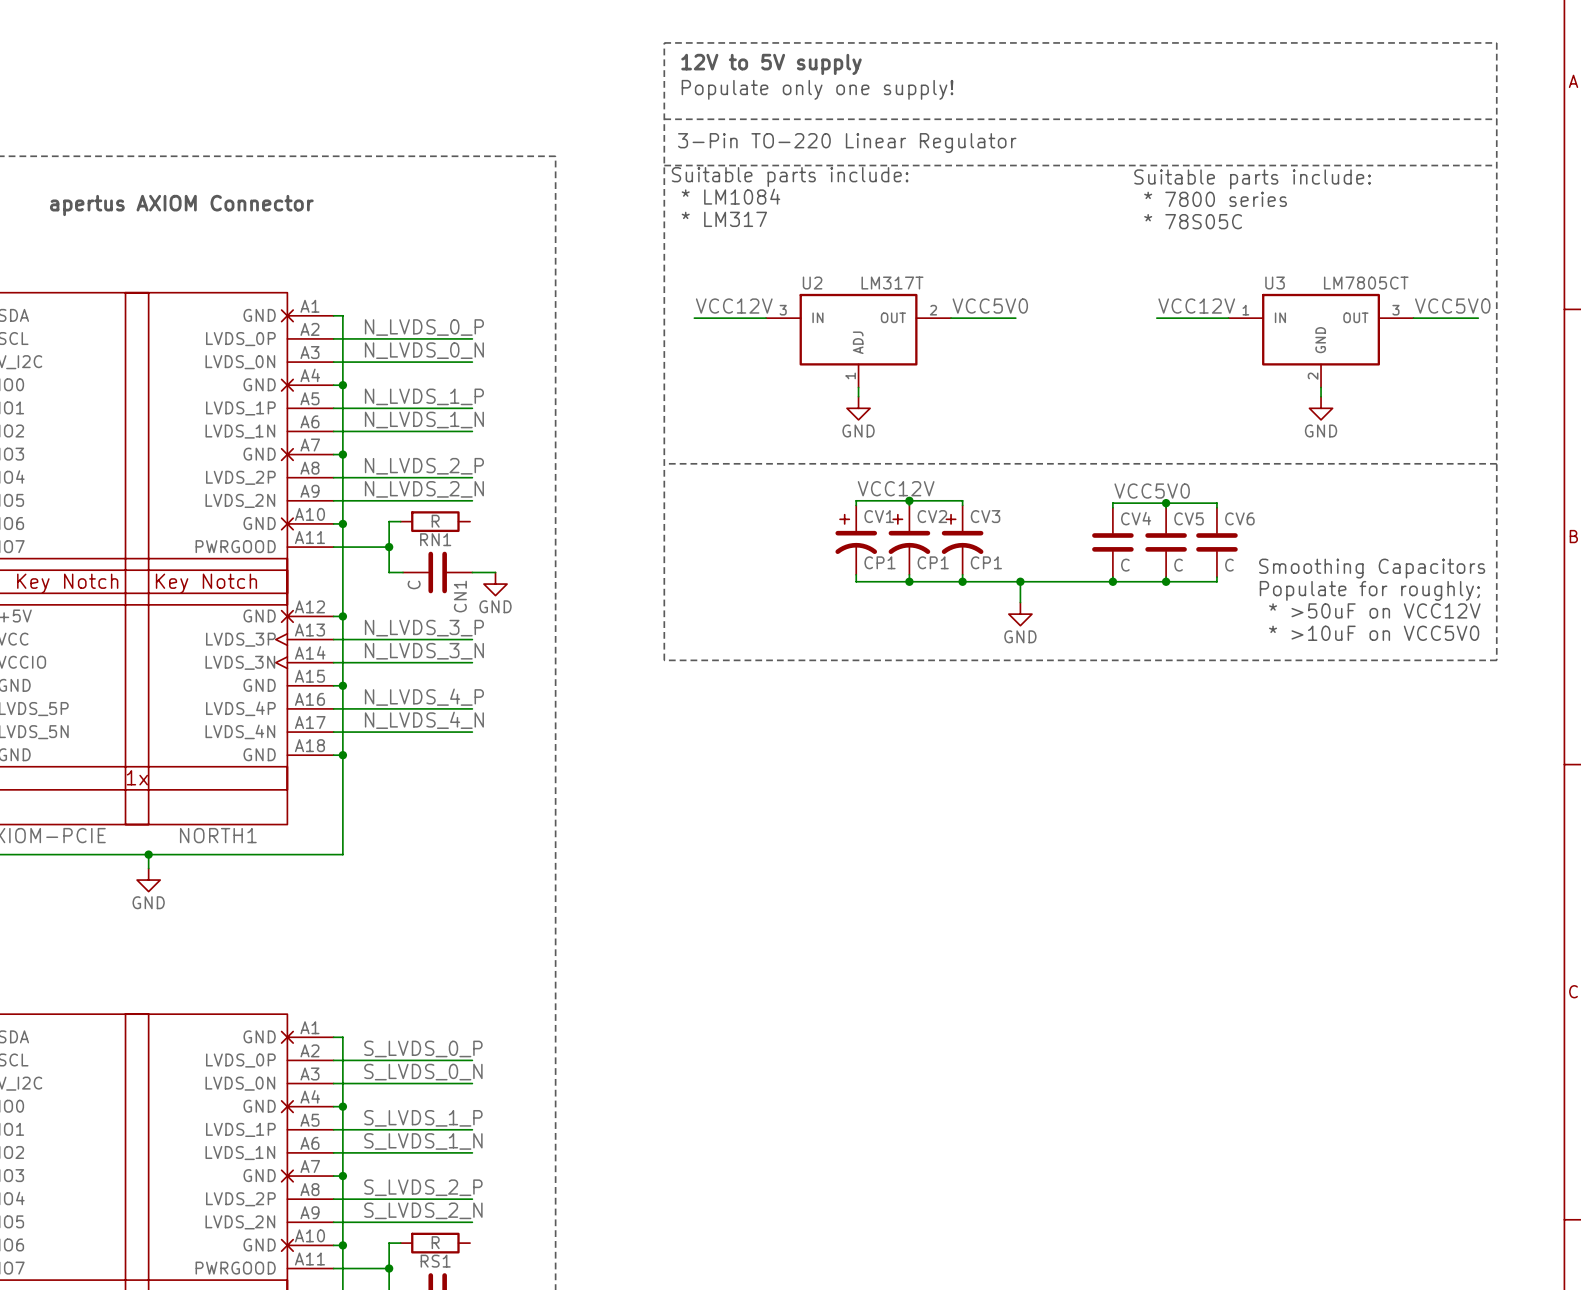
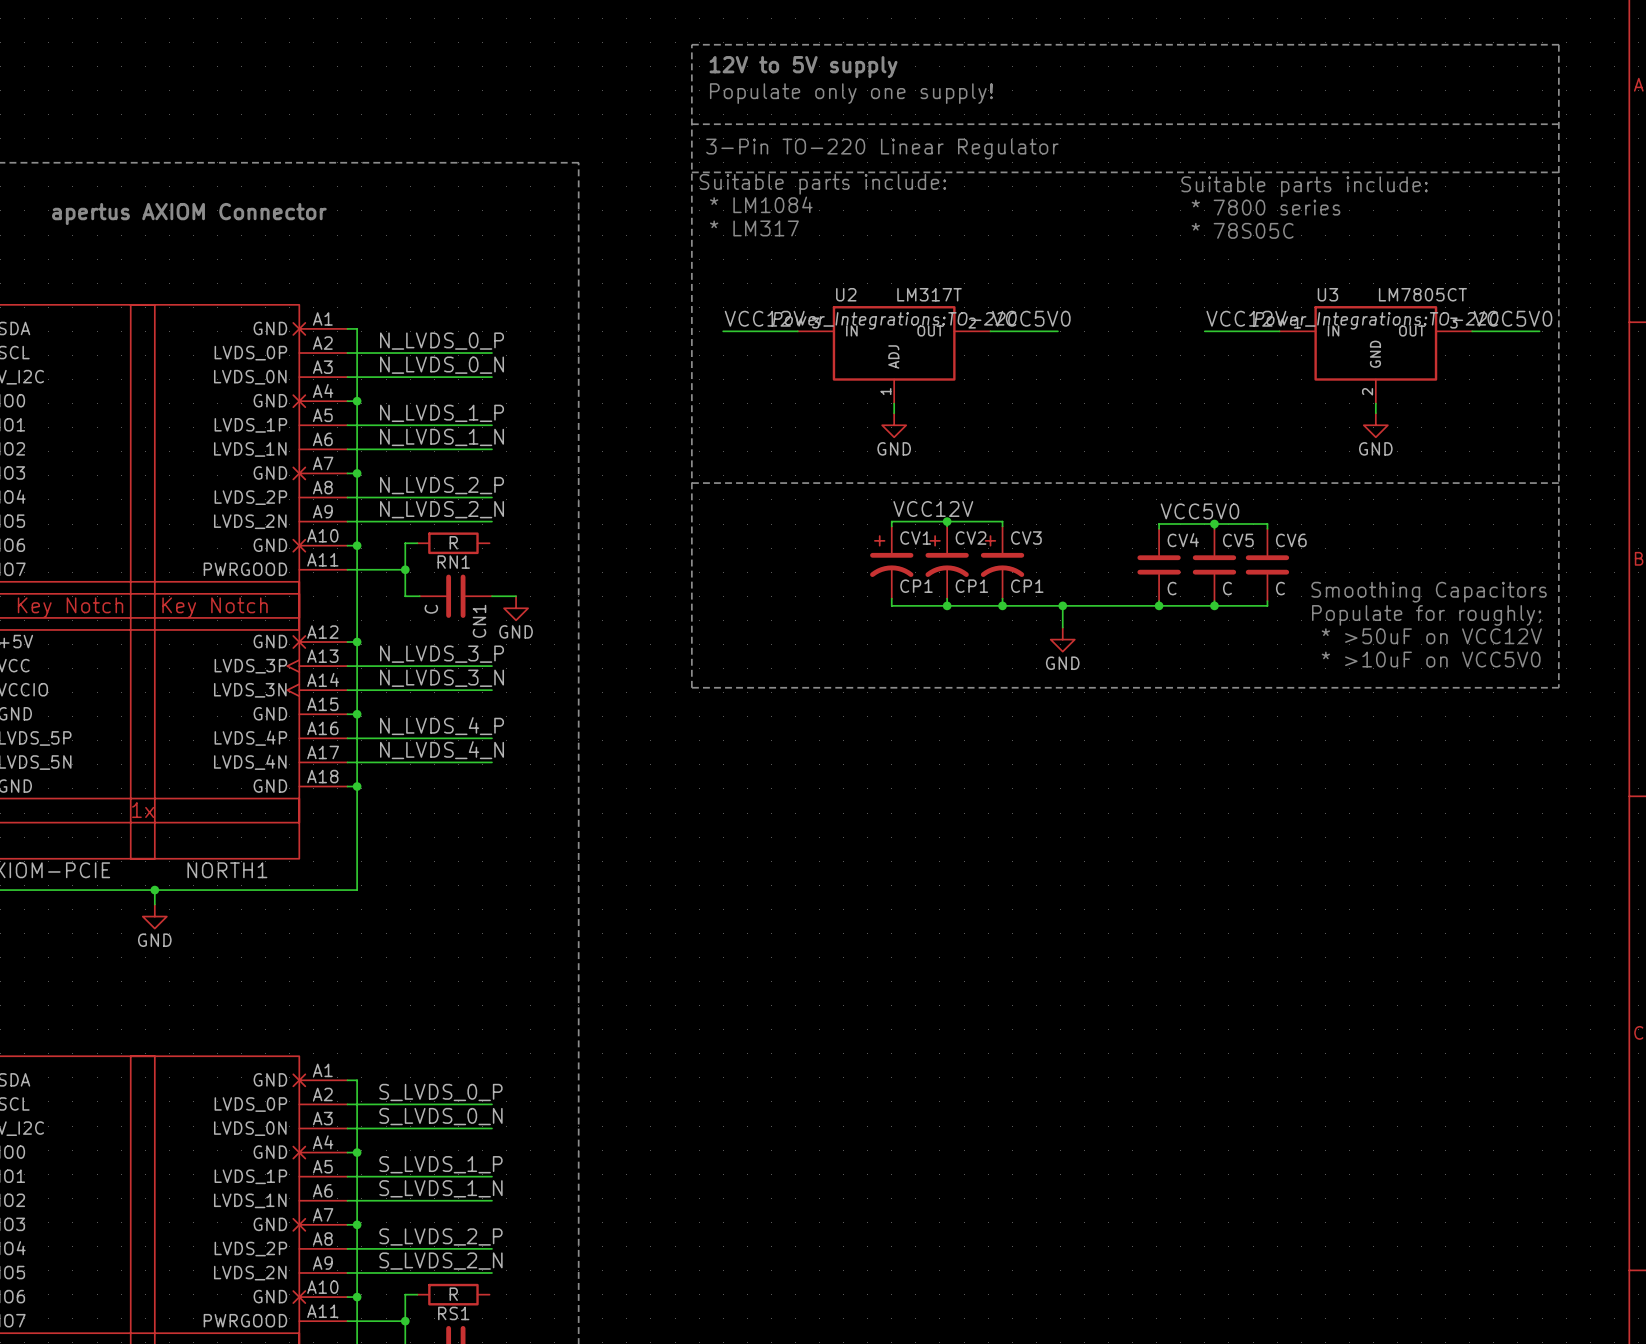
U2 text: none -> Power_Integrations:TO-220 (894, 320)
U3 text: none -> Power_Integrations:TO-220 (1376, 320)

